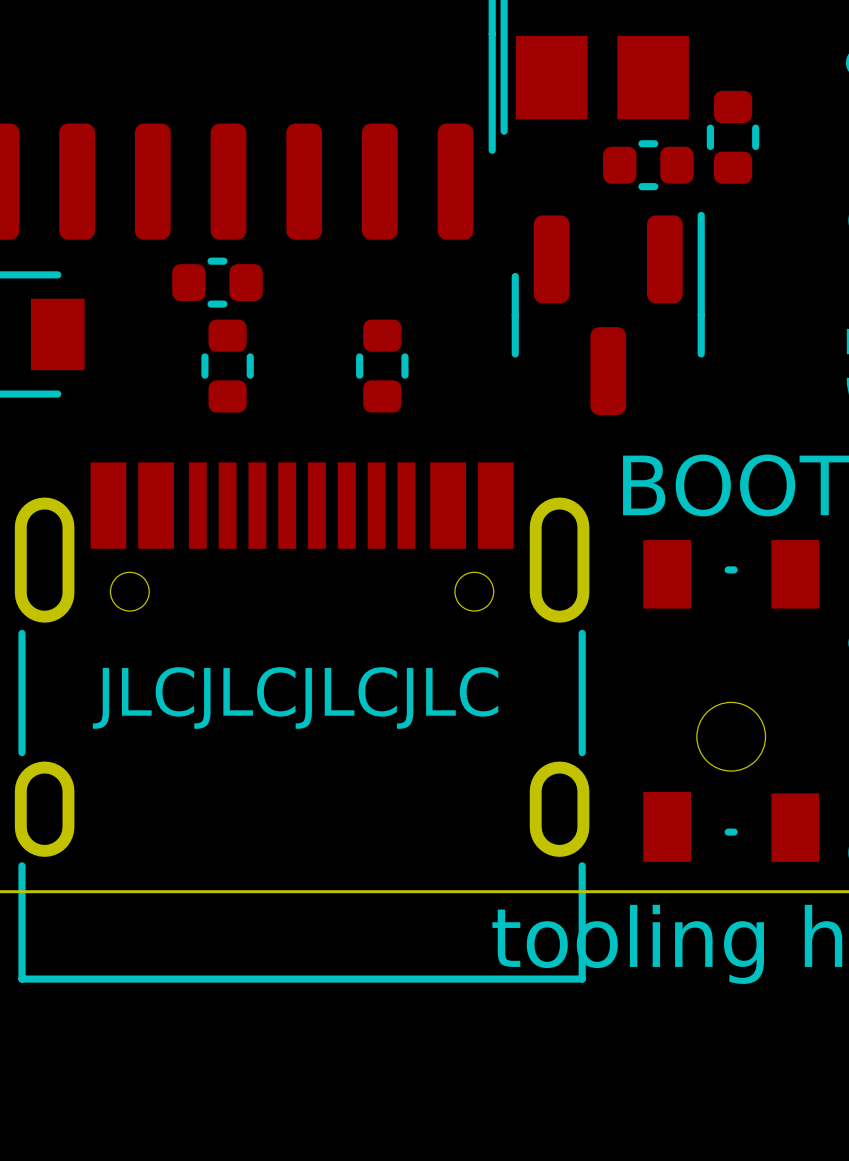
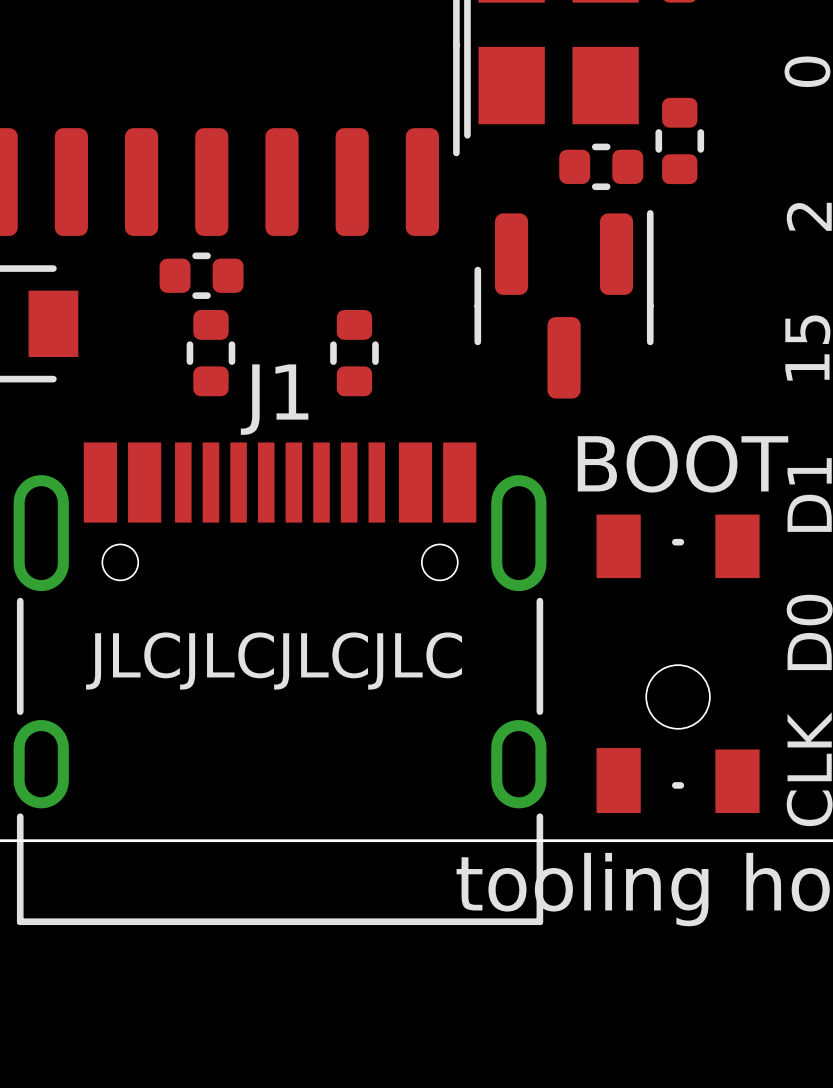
J1 name: none -> J1 (274, 399)

